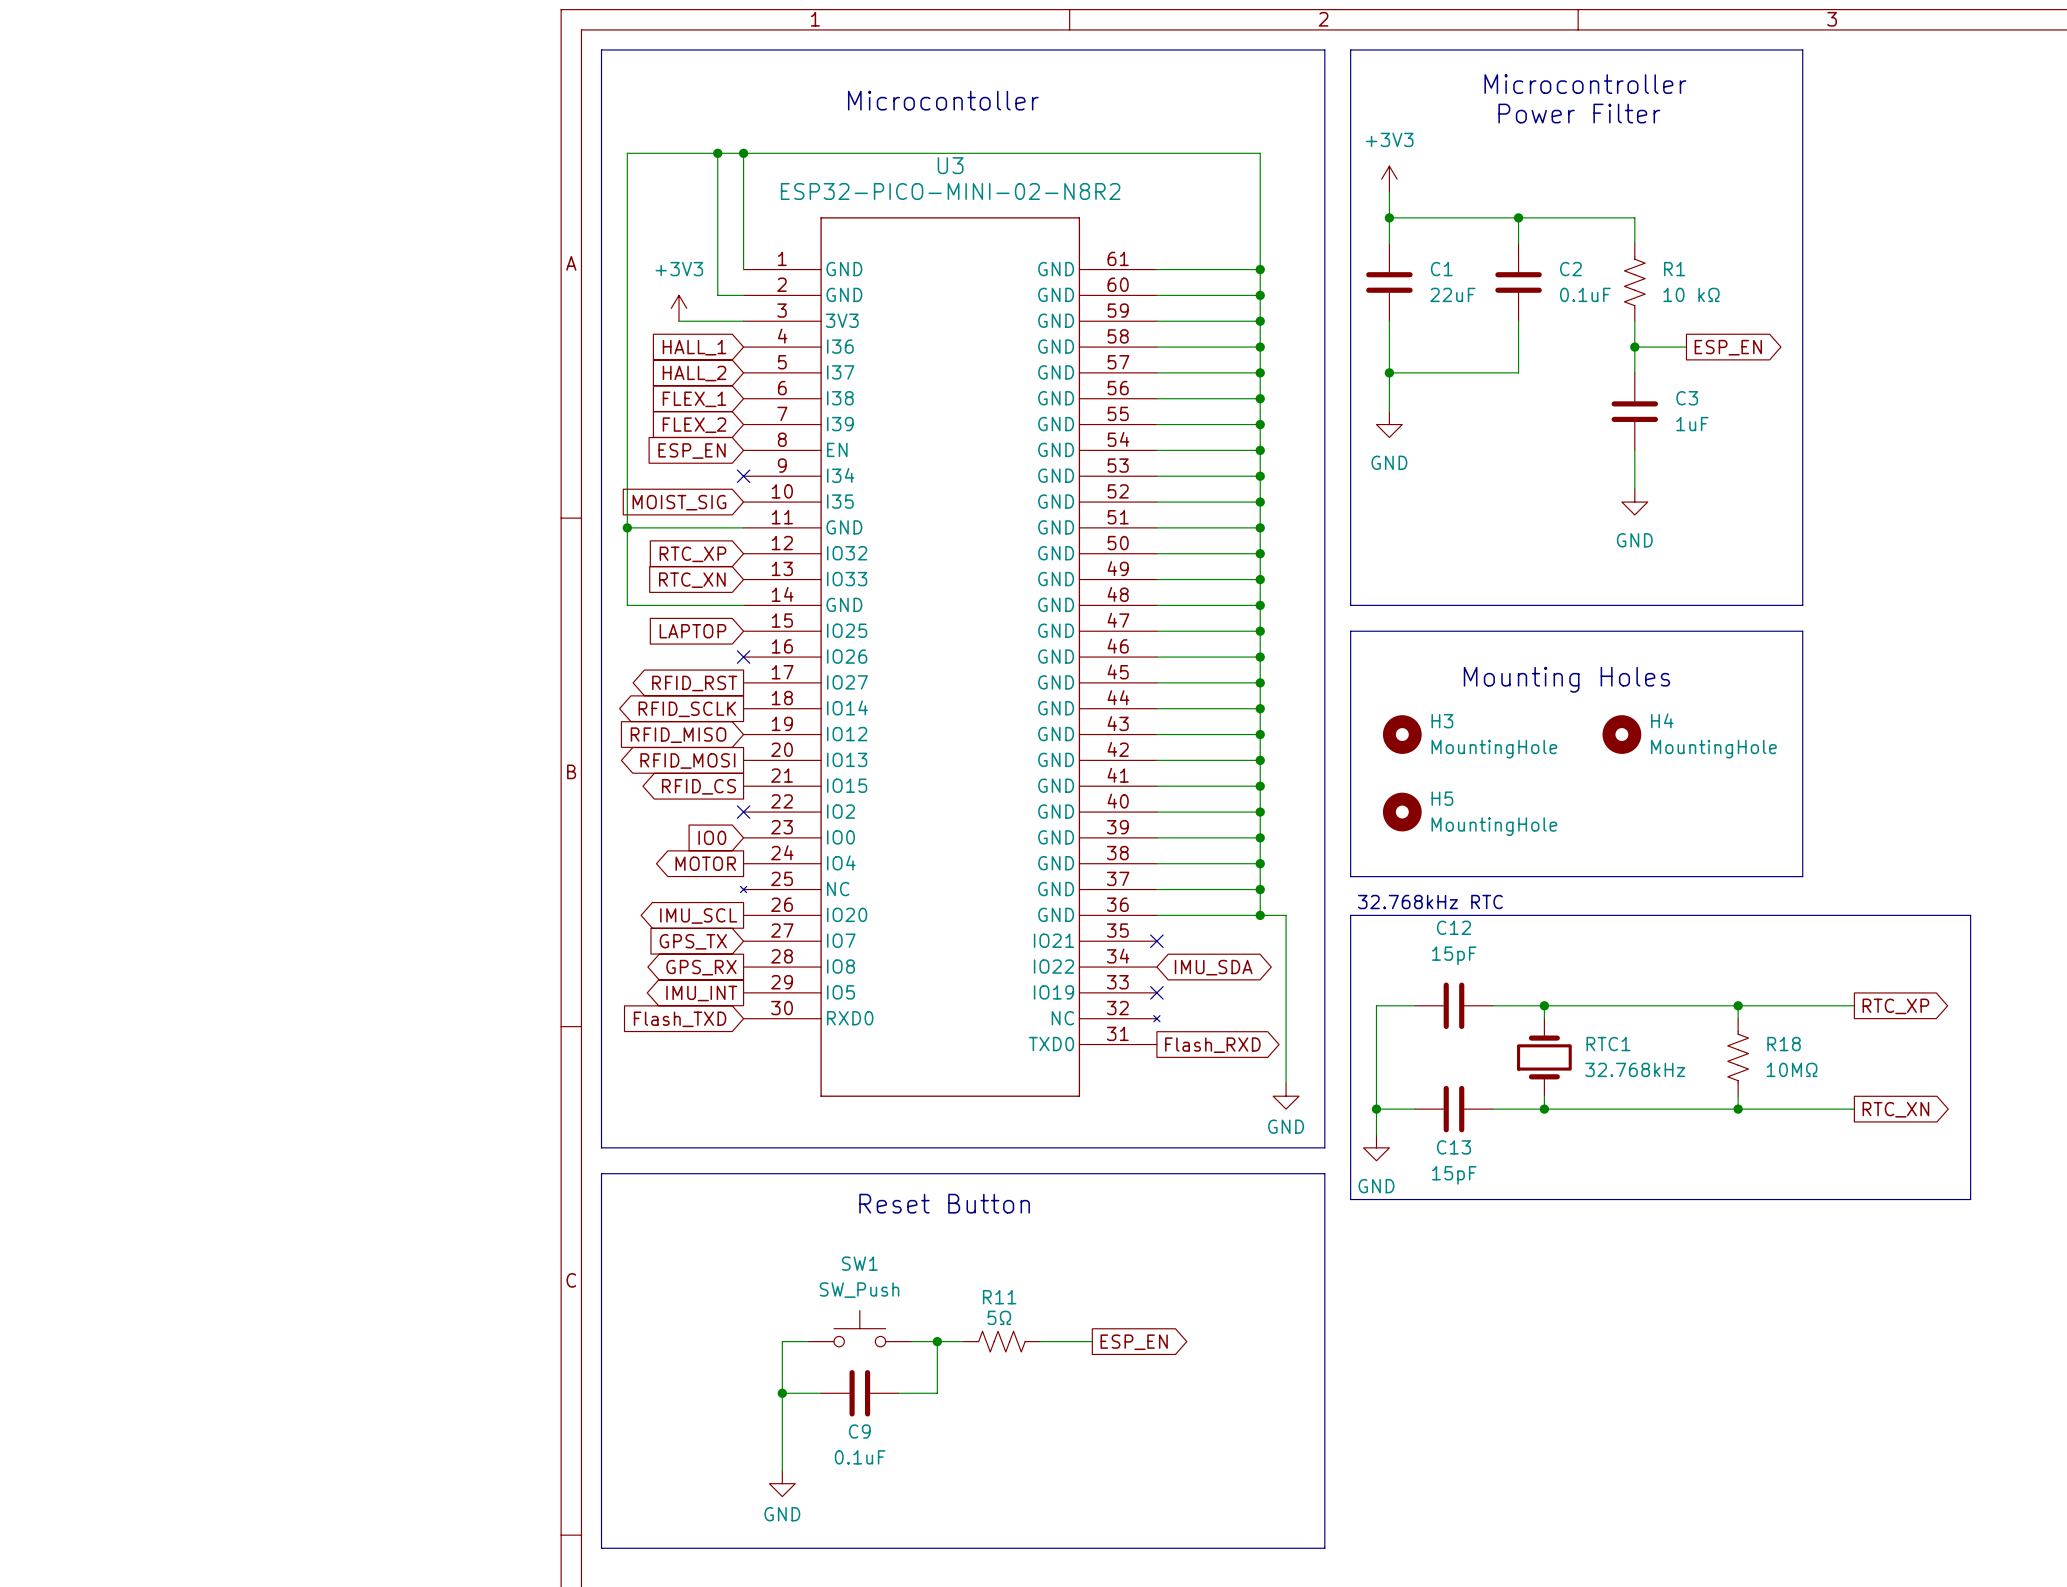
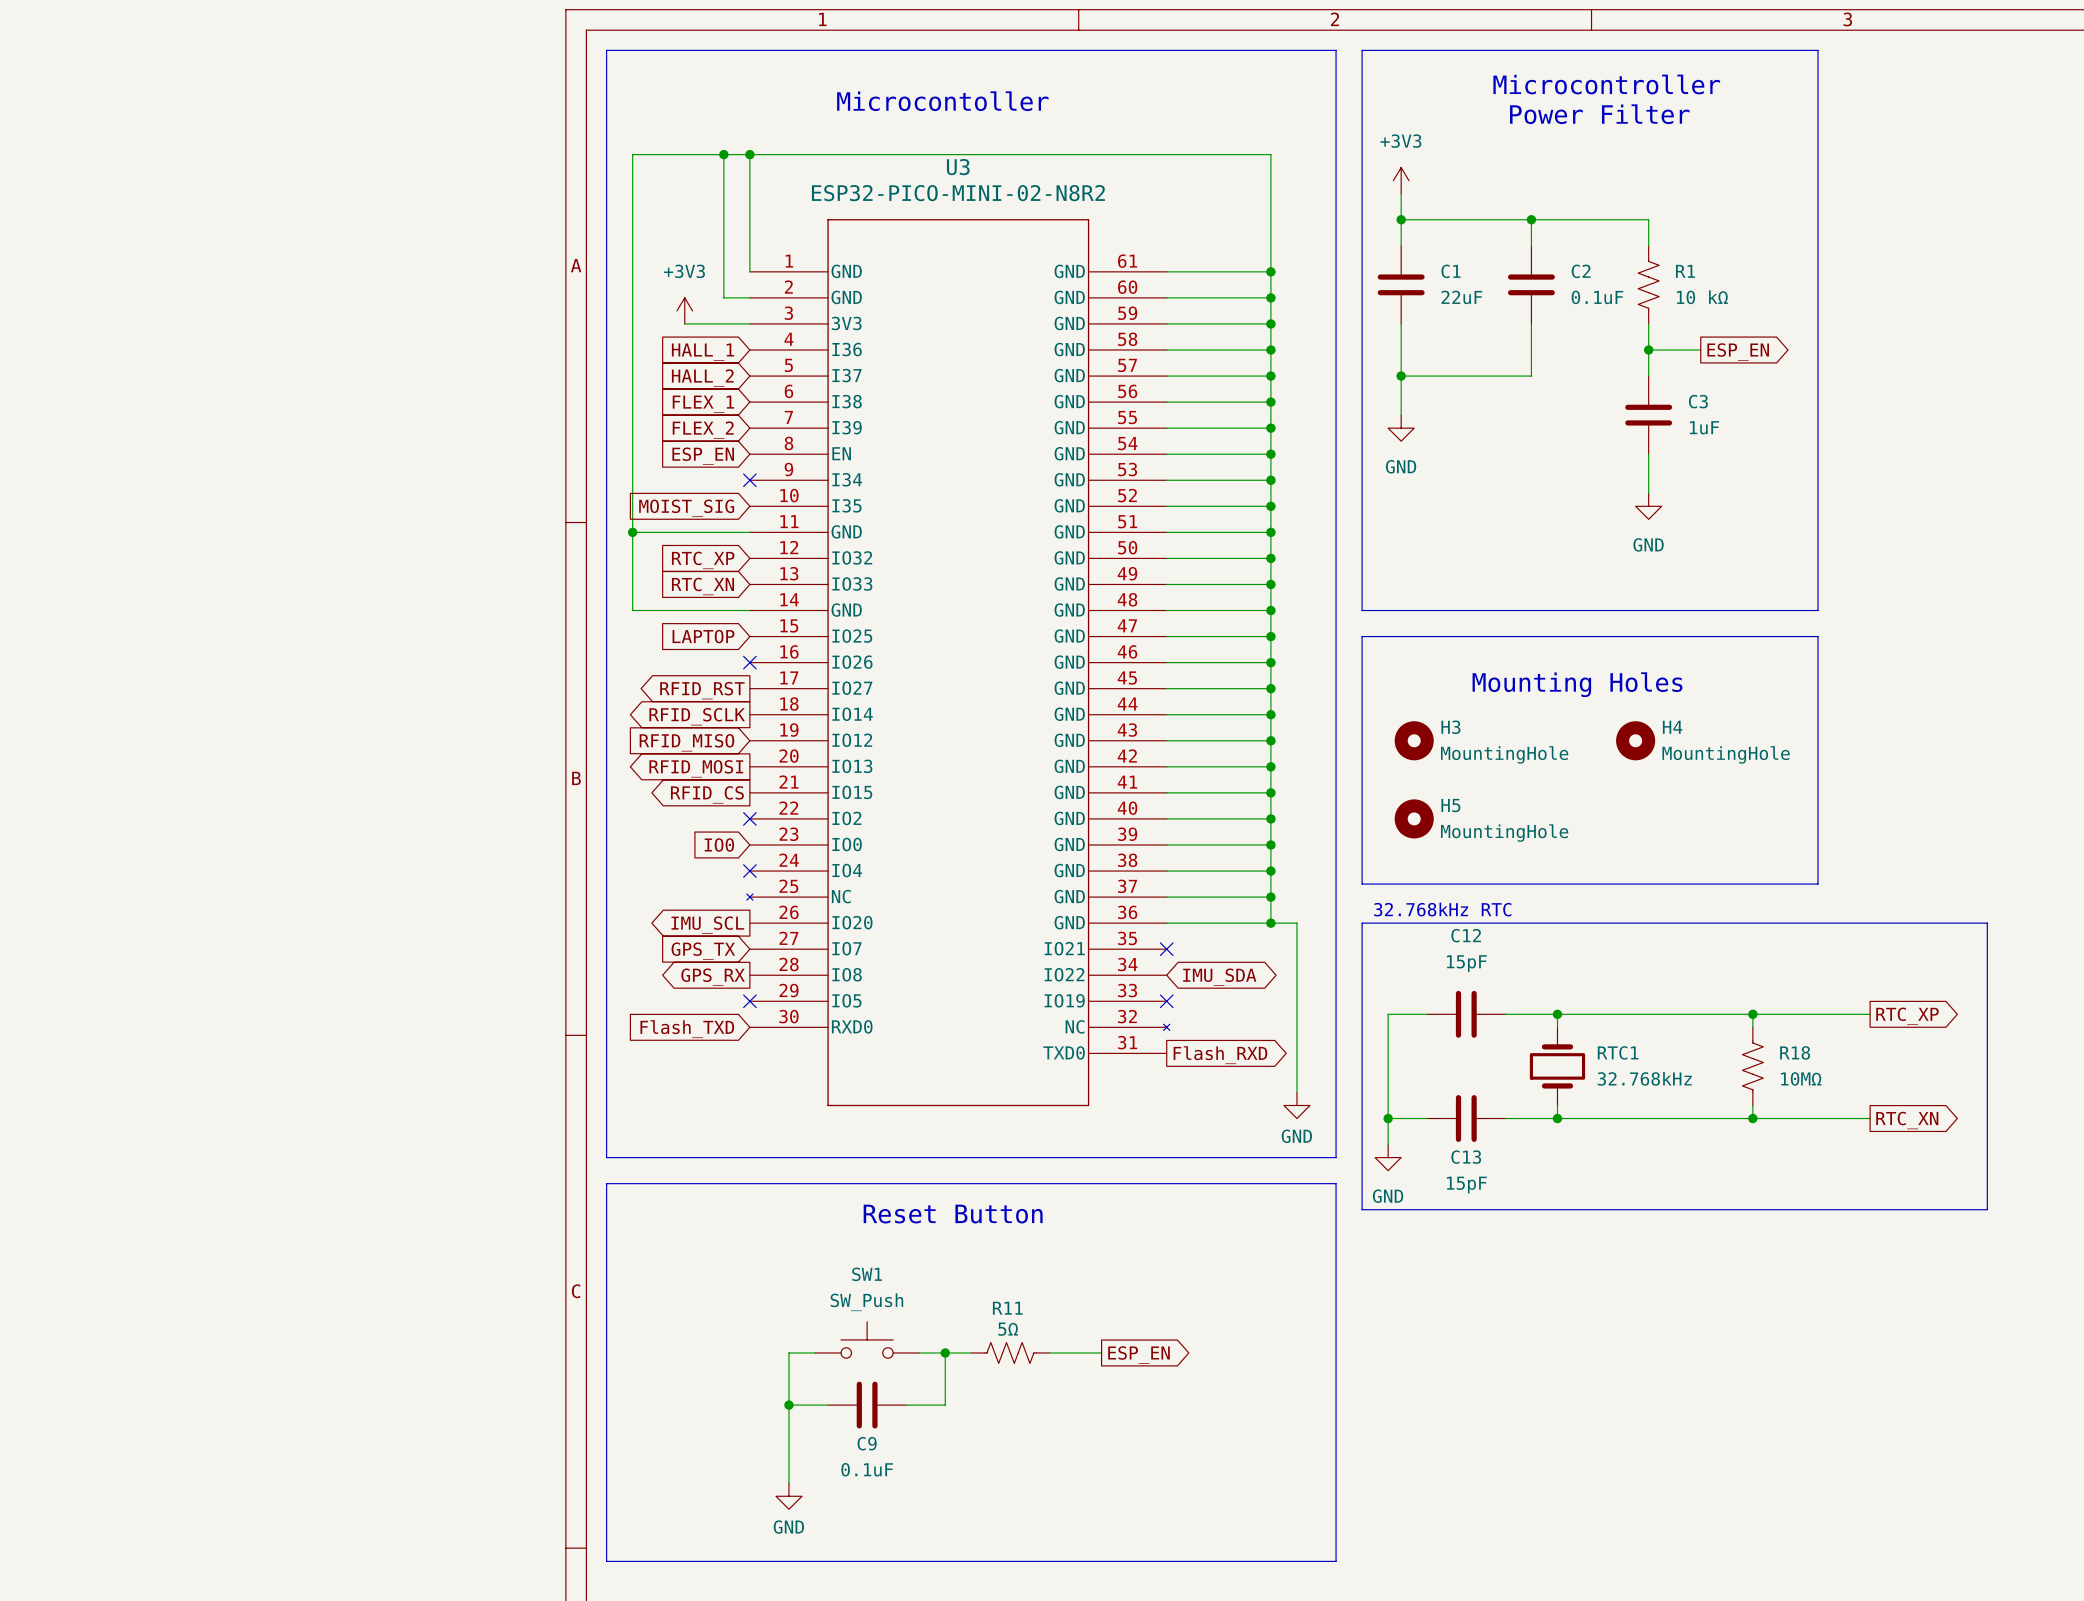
global label: MOTOR (705, 863) -> none
no-connect mark: none -> (749, 871)
no-connect mark: none -> (749, 1001)
global label: IMU_INT (701, 993) -> none

